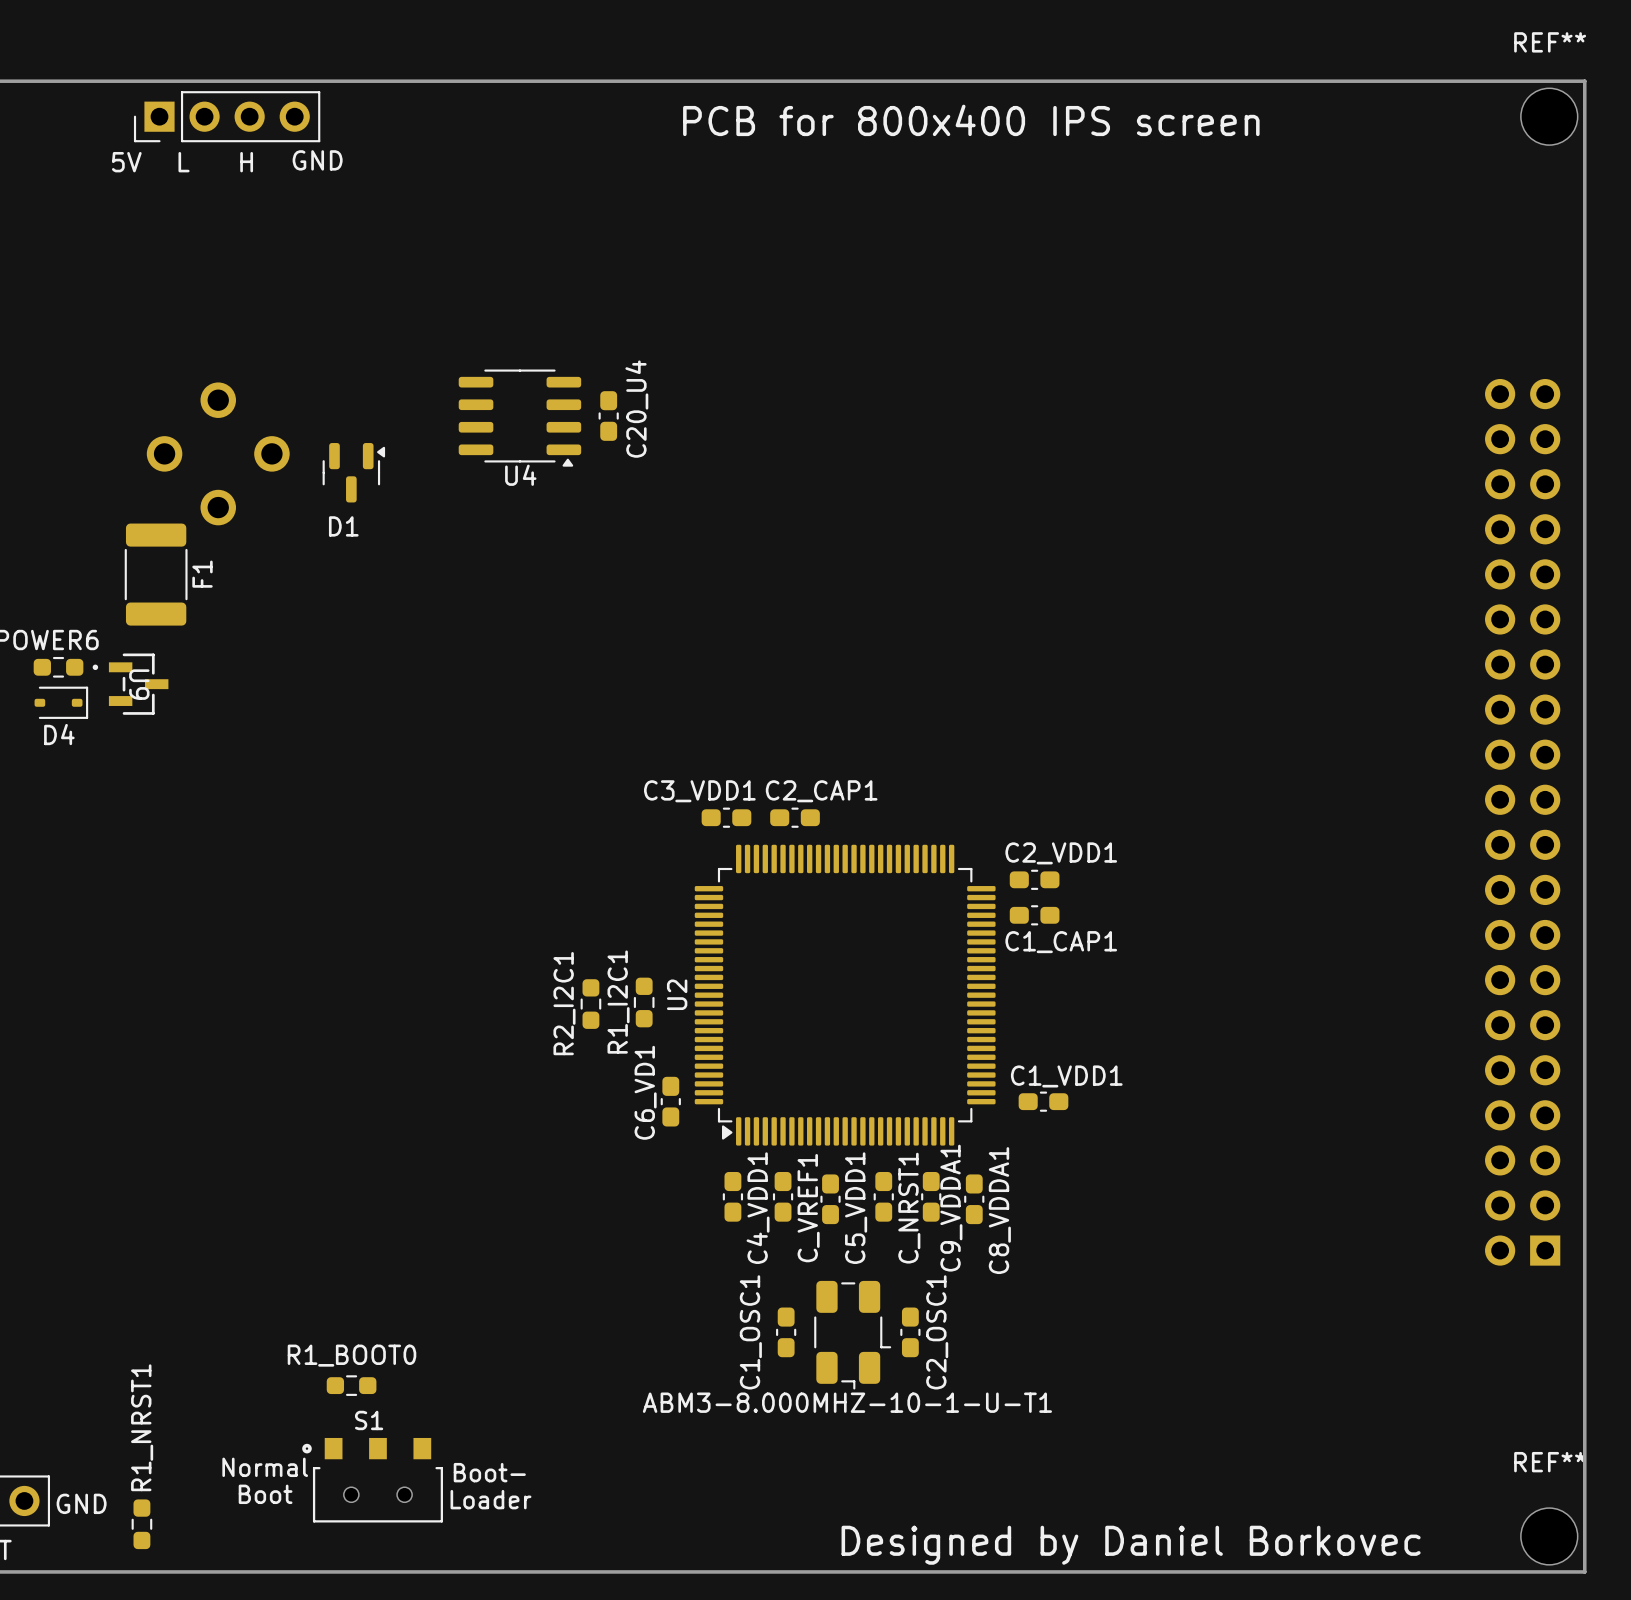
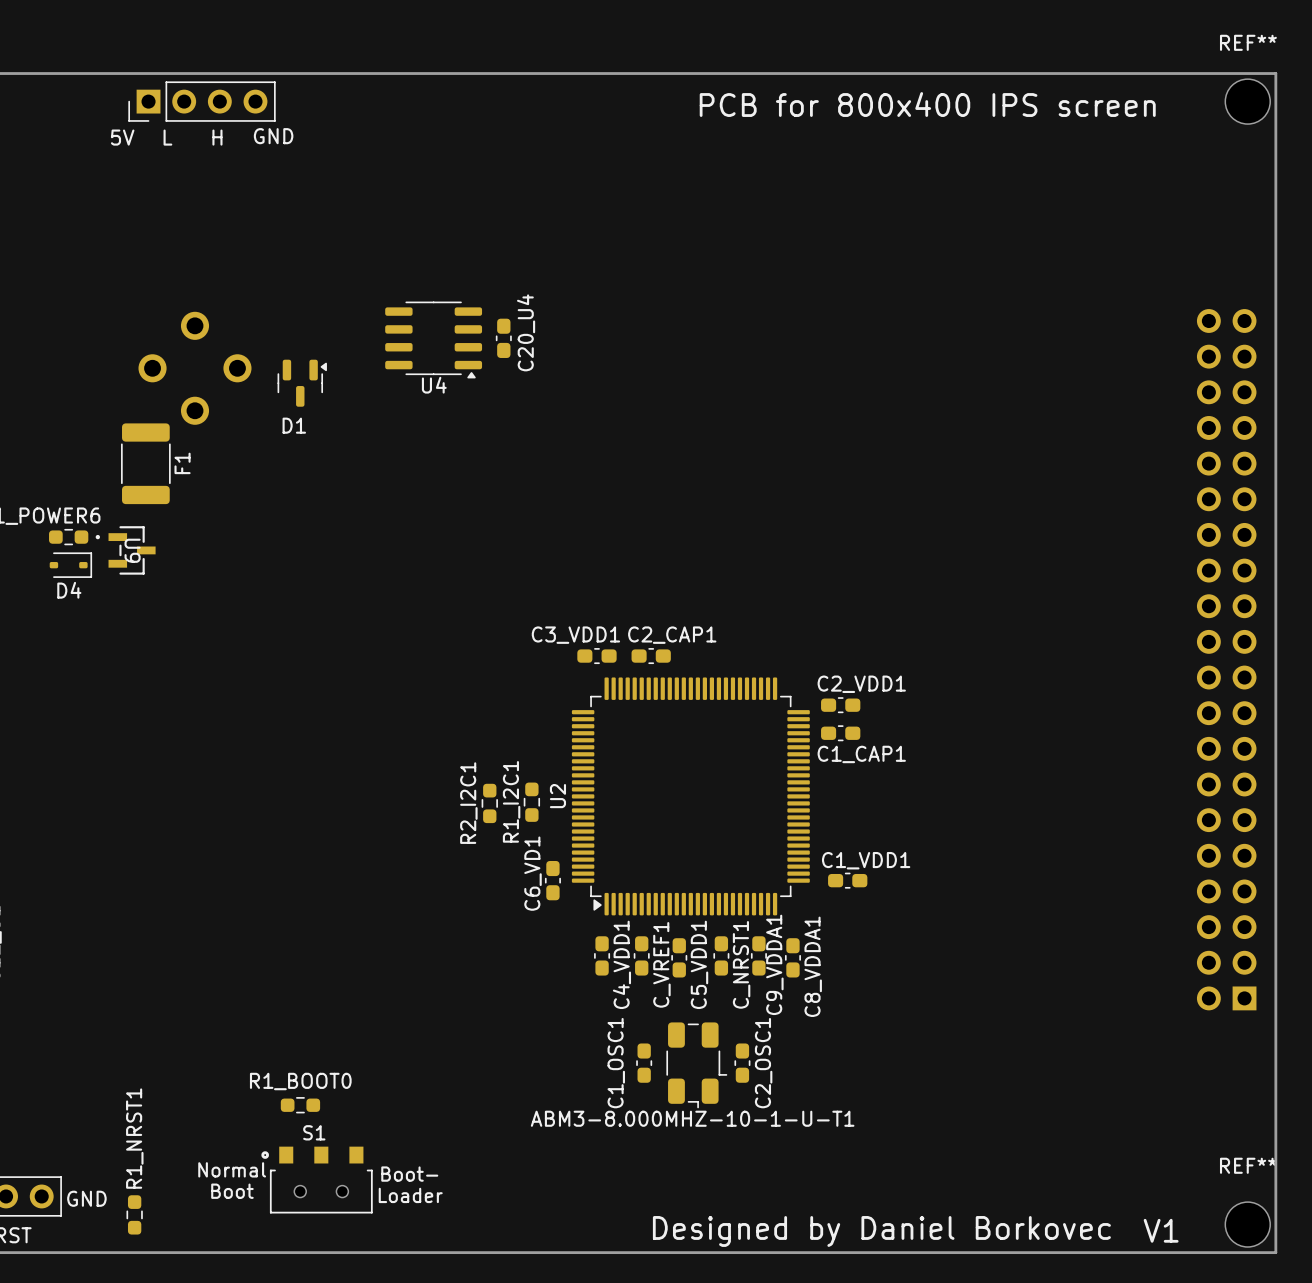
text position: PCB for 800x400 IPS screen (971, 120) -> PCB for 800x400 IPS screen (927, 104)
text: none -> V1 (1161, 1230)
text position: Designed by Daniel Borkovec (1131, 1545) -> Designed by Daniel Borkovec (881, 1231)

